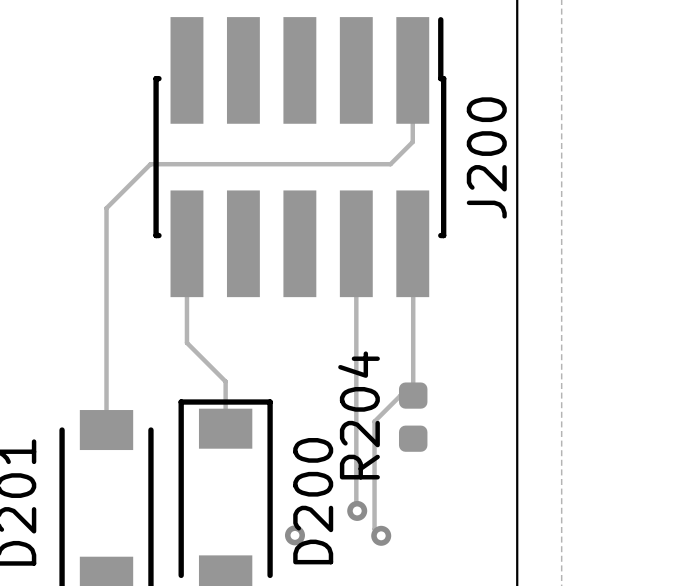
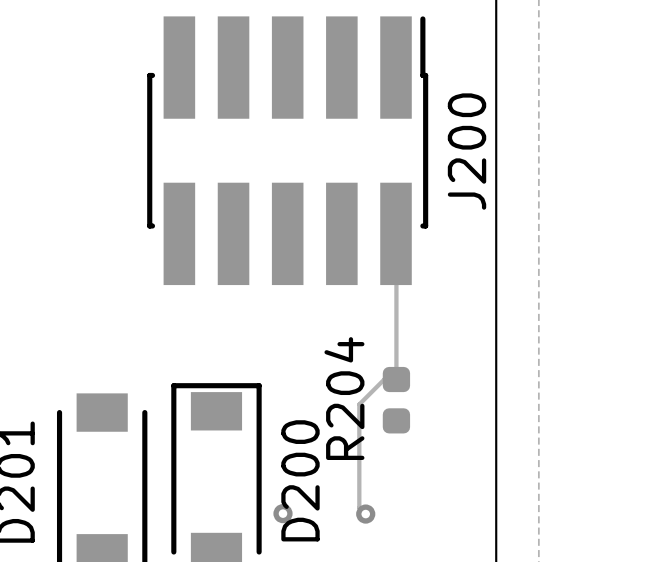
track: (412, 70) (412, 141) (390, 164) (150, 164) (106, 208) (106, 430) -> none
track: (186, 243) (186, 342) (225, 381) (225, 428) -> none
track: (356, 243) (357, 510) -> none
via: (357, 510) -> none

